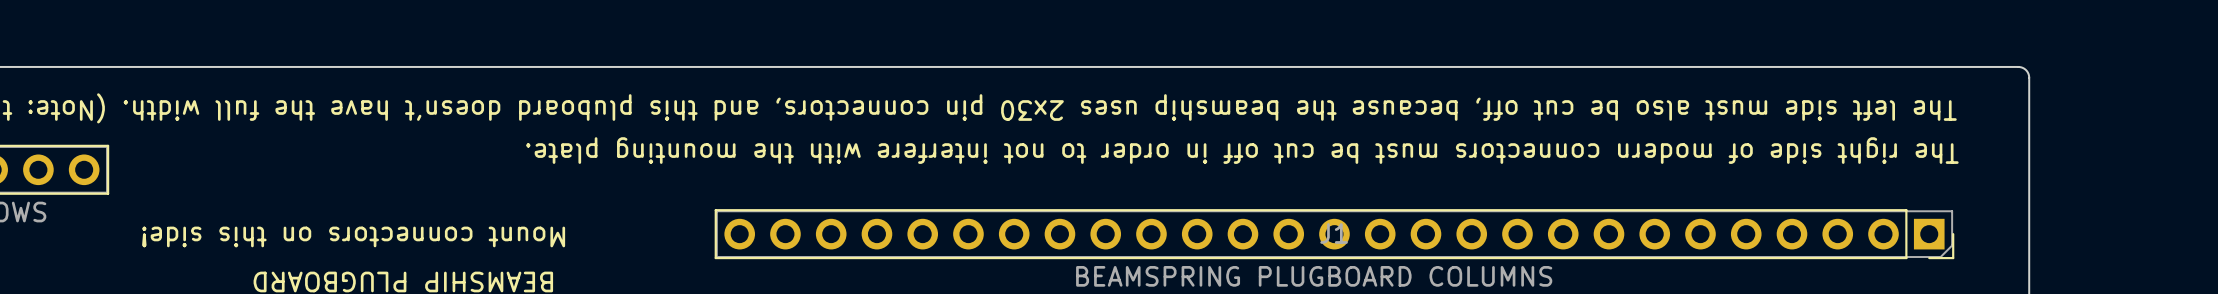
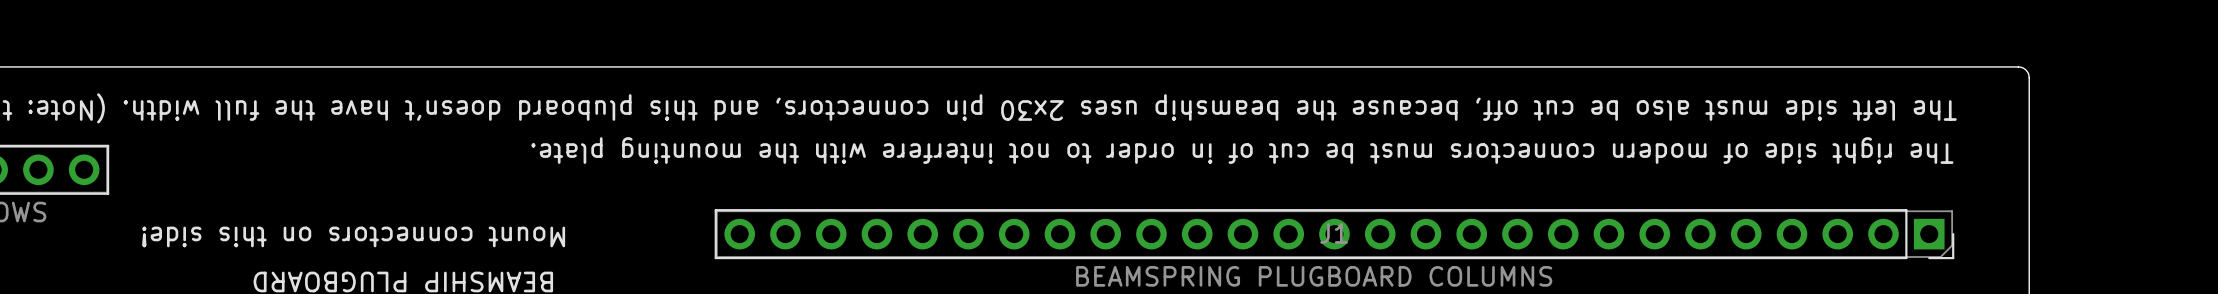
text: The right side of modern connectors must be cut off in order to not interfere with the mounting plate. (1242, 150) -> The right side of modern connectors must be cut of in order to not interfere with the mounting plate. (1242, 150)

